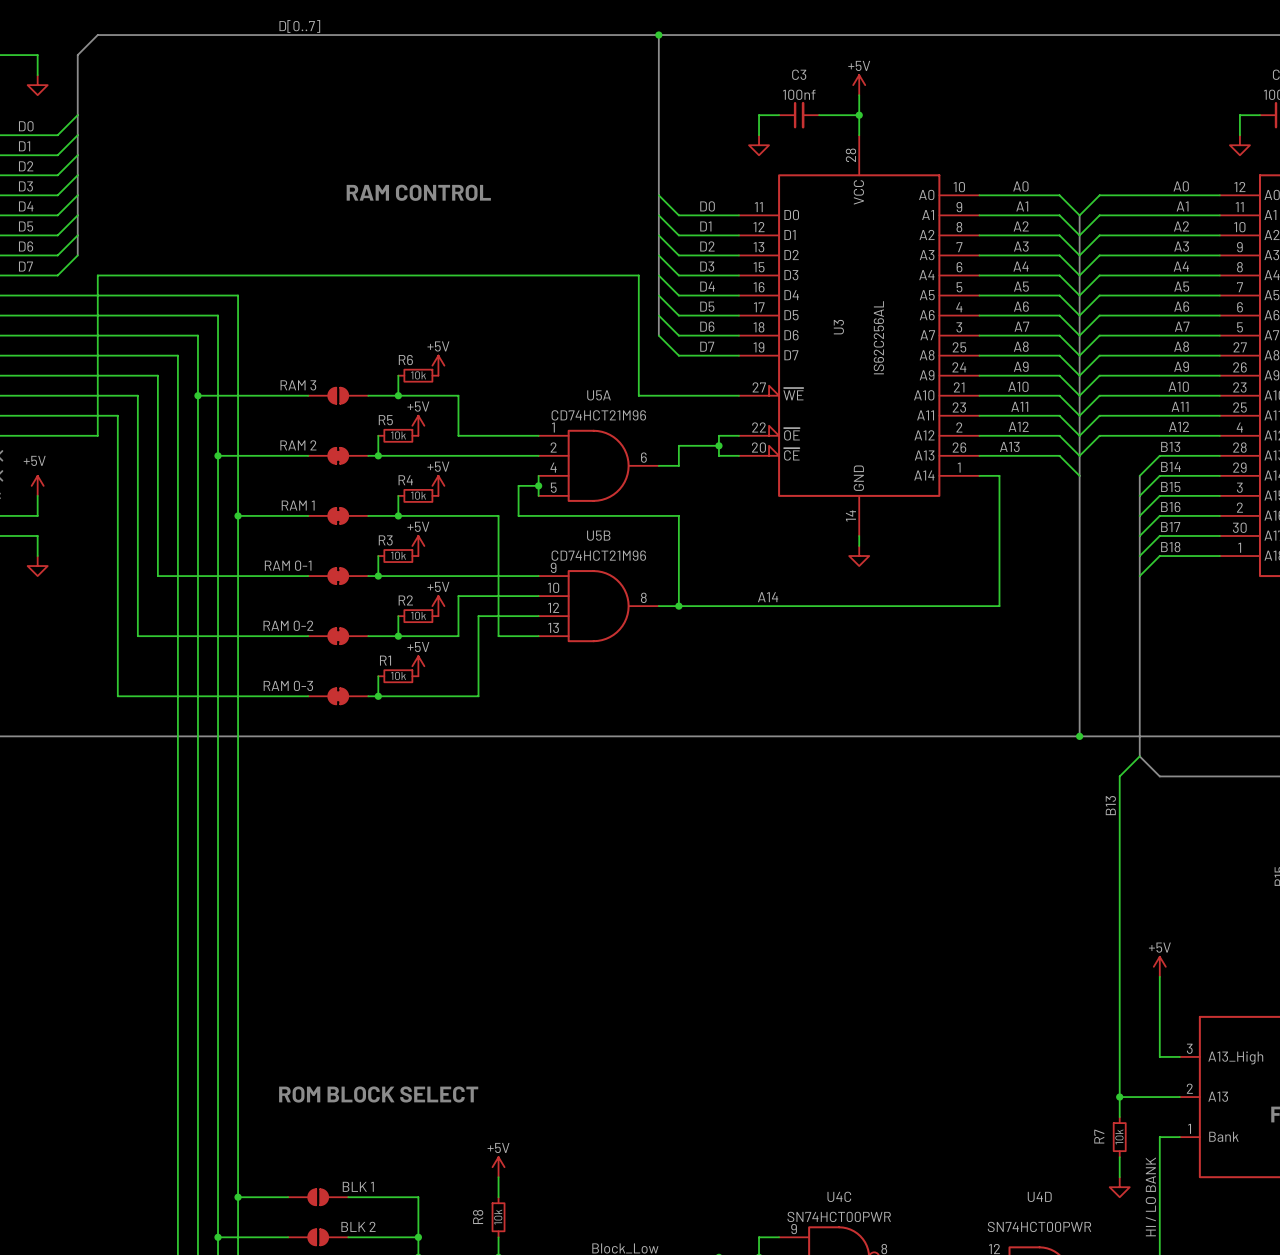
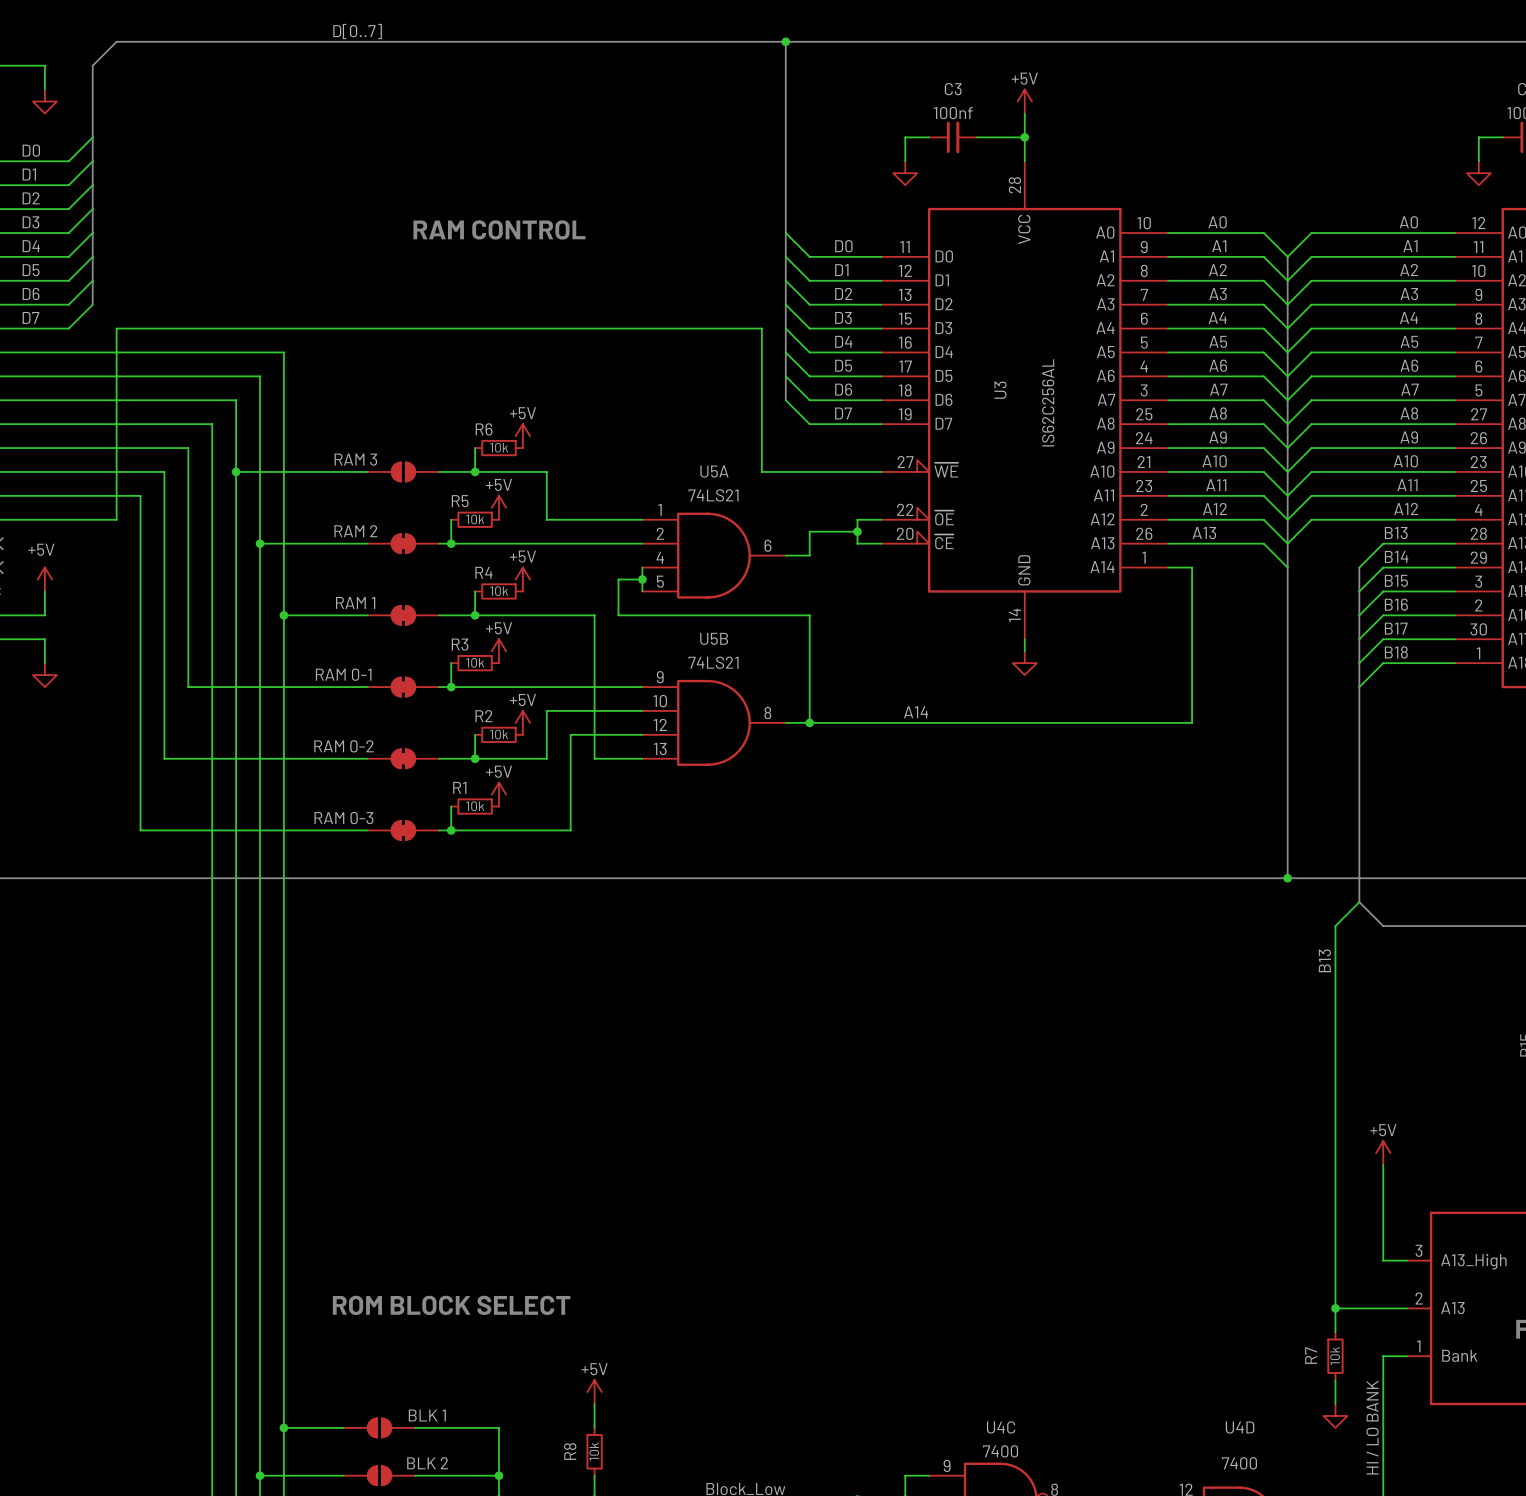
U5A value: CD74HCT21M96 (598, 415) -> 74LS21 (713, 495)
U5B value: CD74HCT21M96 (598, 555) -> 74LS21 (713, 662)
U4C value: SN74HCT00PWR (839, 1216) -> 7400 (1000, 1451)
U4D value: SN74HCT00PWR (1039, 1226) -> 7400 (1239, 1463)

